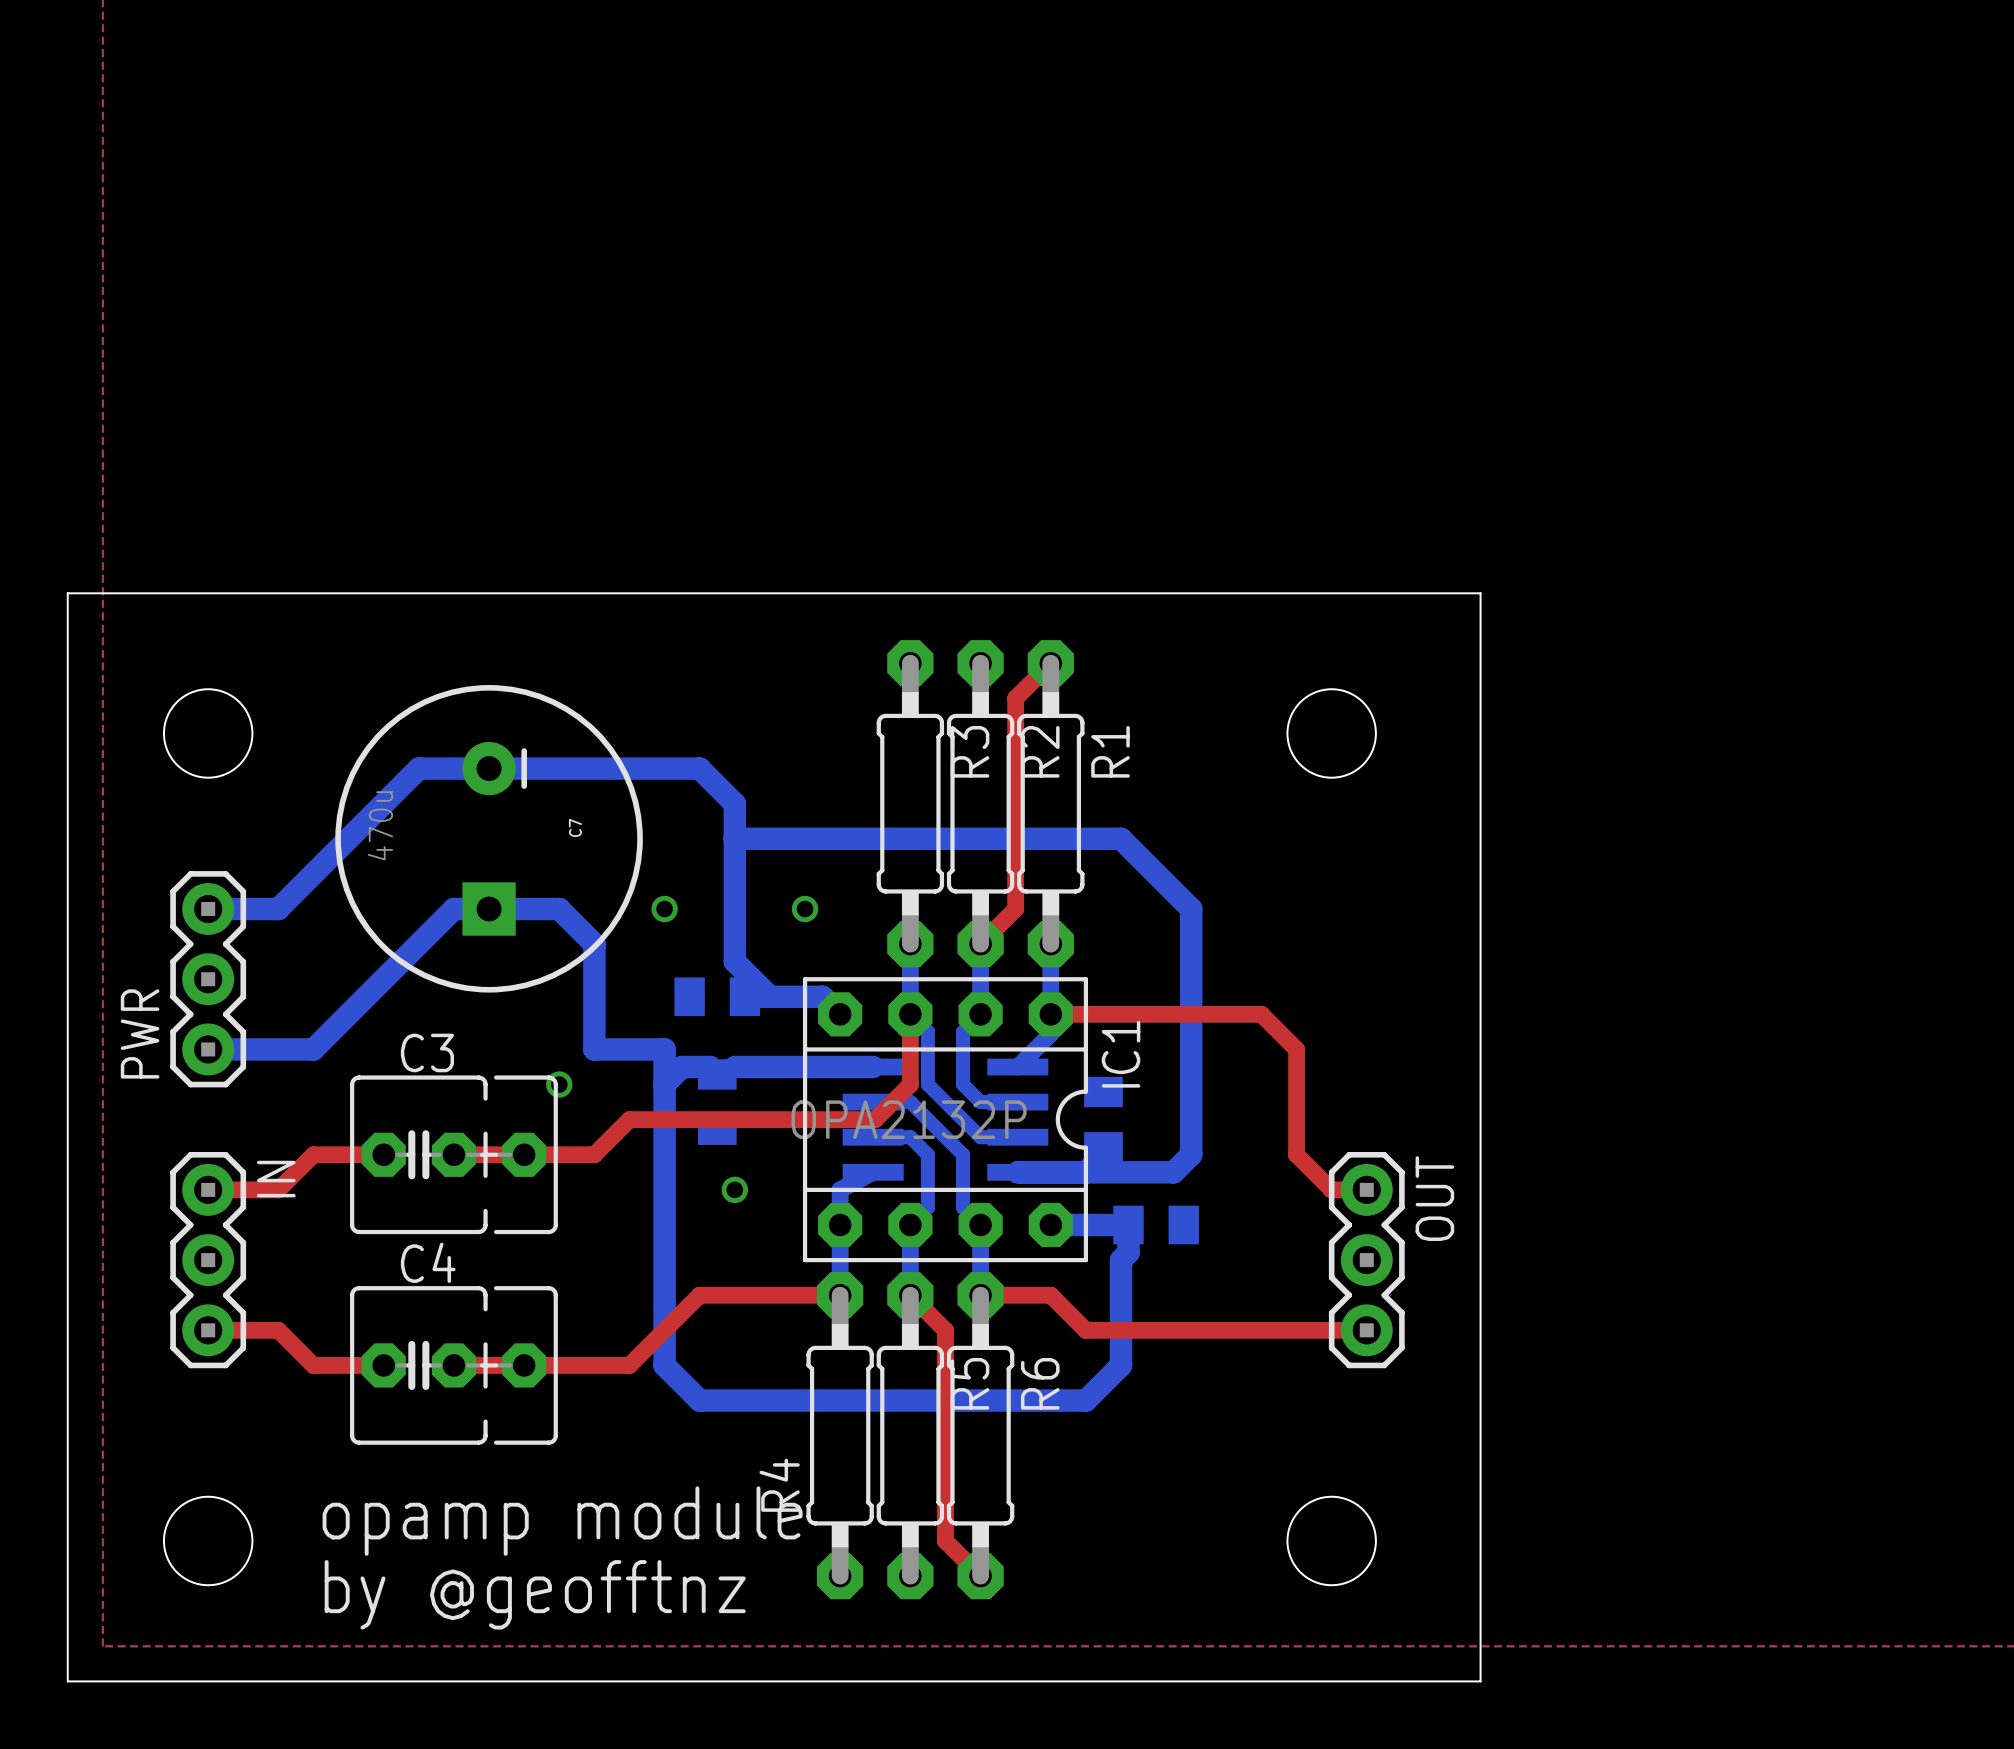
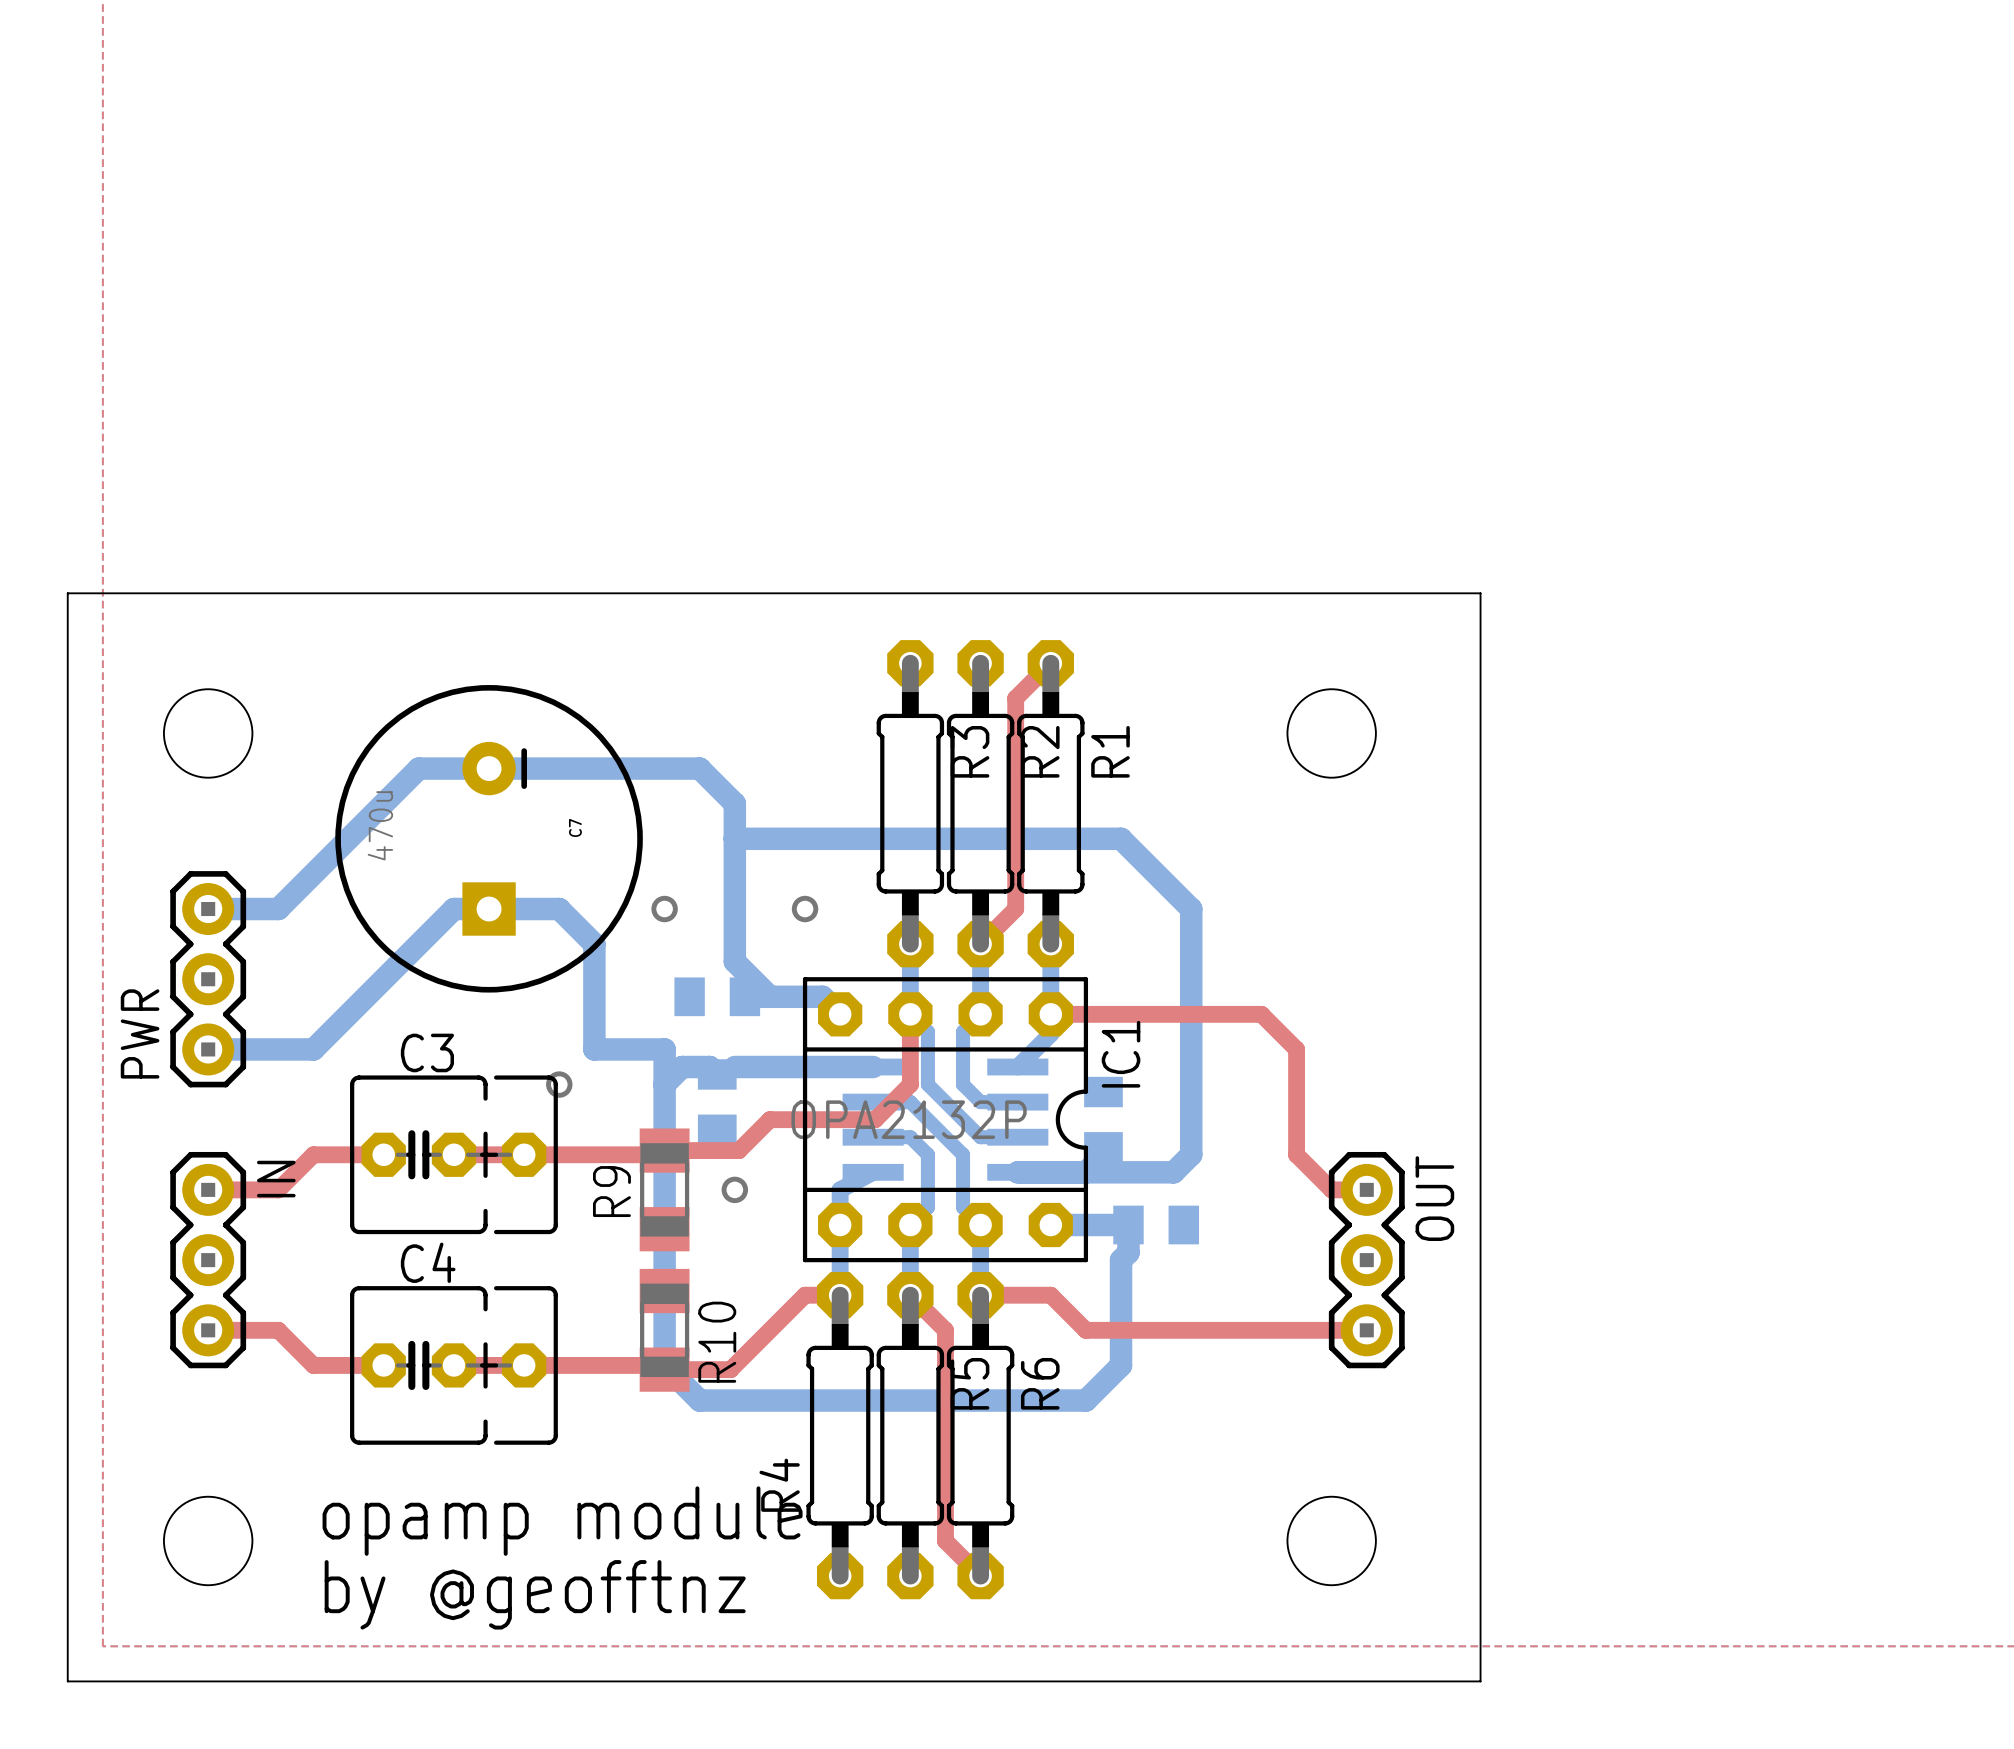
top track: (769, 1119) (629, 1119) (594, 1154) -> (769, 1119) (739, 1150) (664, 1150) (660, 1154) (594, 1154)
R9: none -> (664, 1189)
top track: (805, 1295) (699, 1295) (629, 1365) -> (805, 1295) (730, 1369) (664, 1369) (660, 1365) (629, 1365)
R10: none -> (664, 1330)

